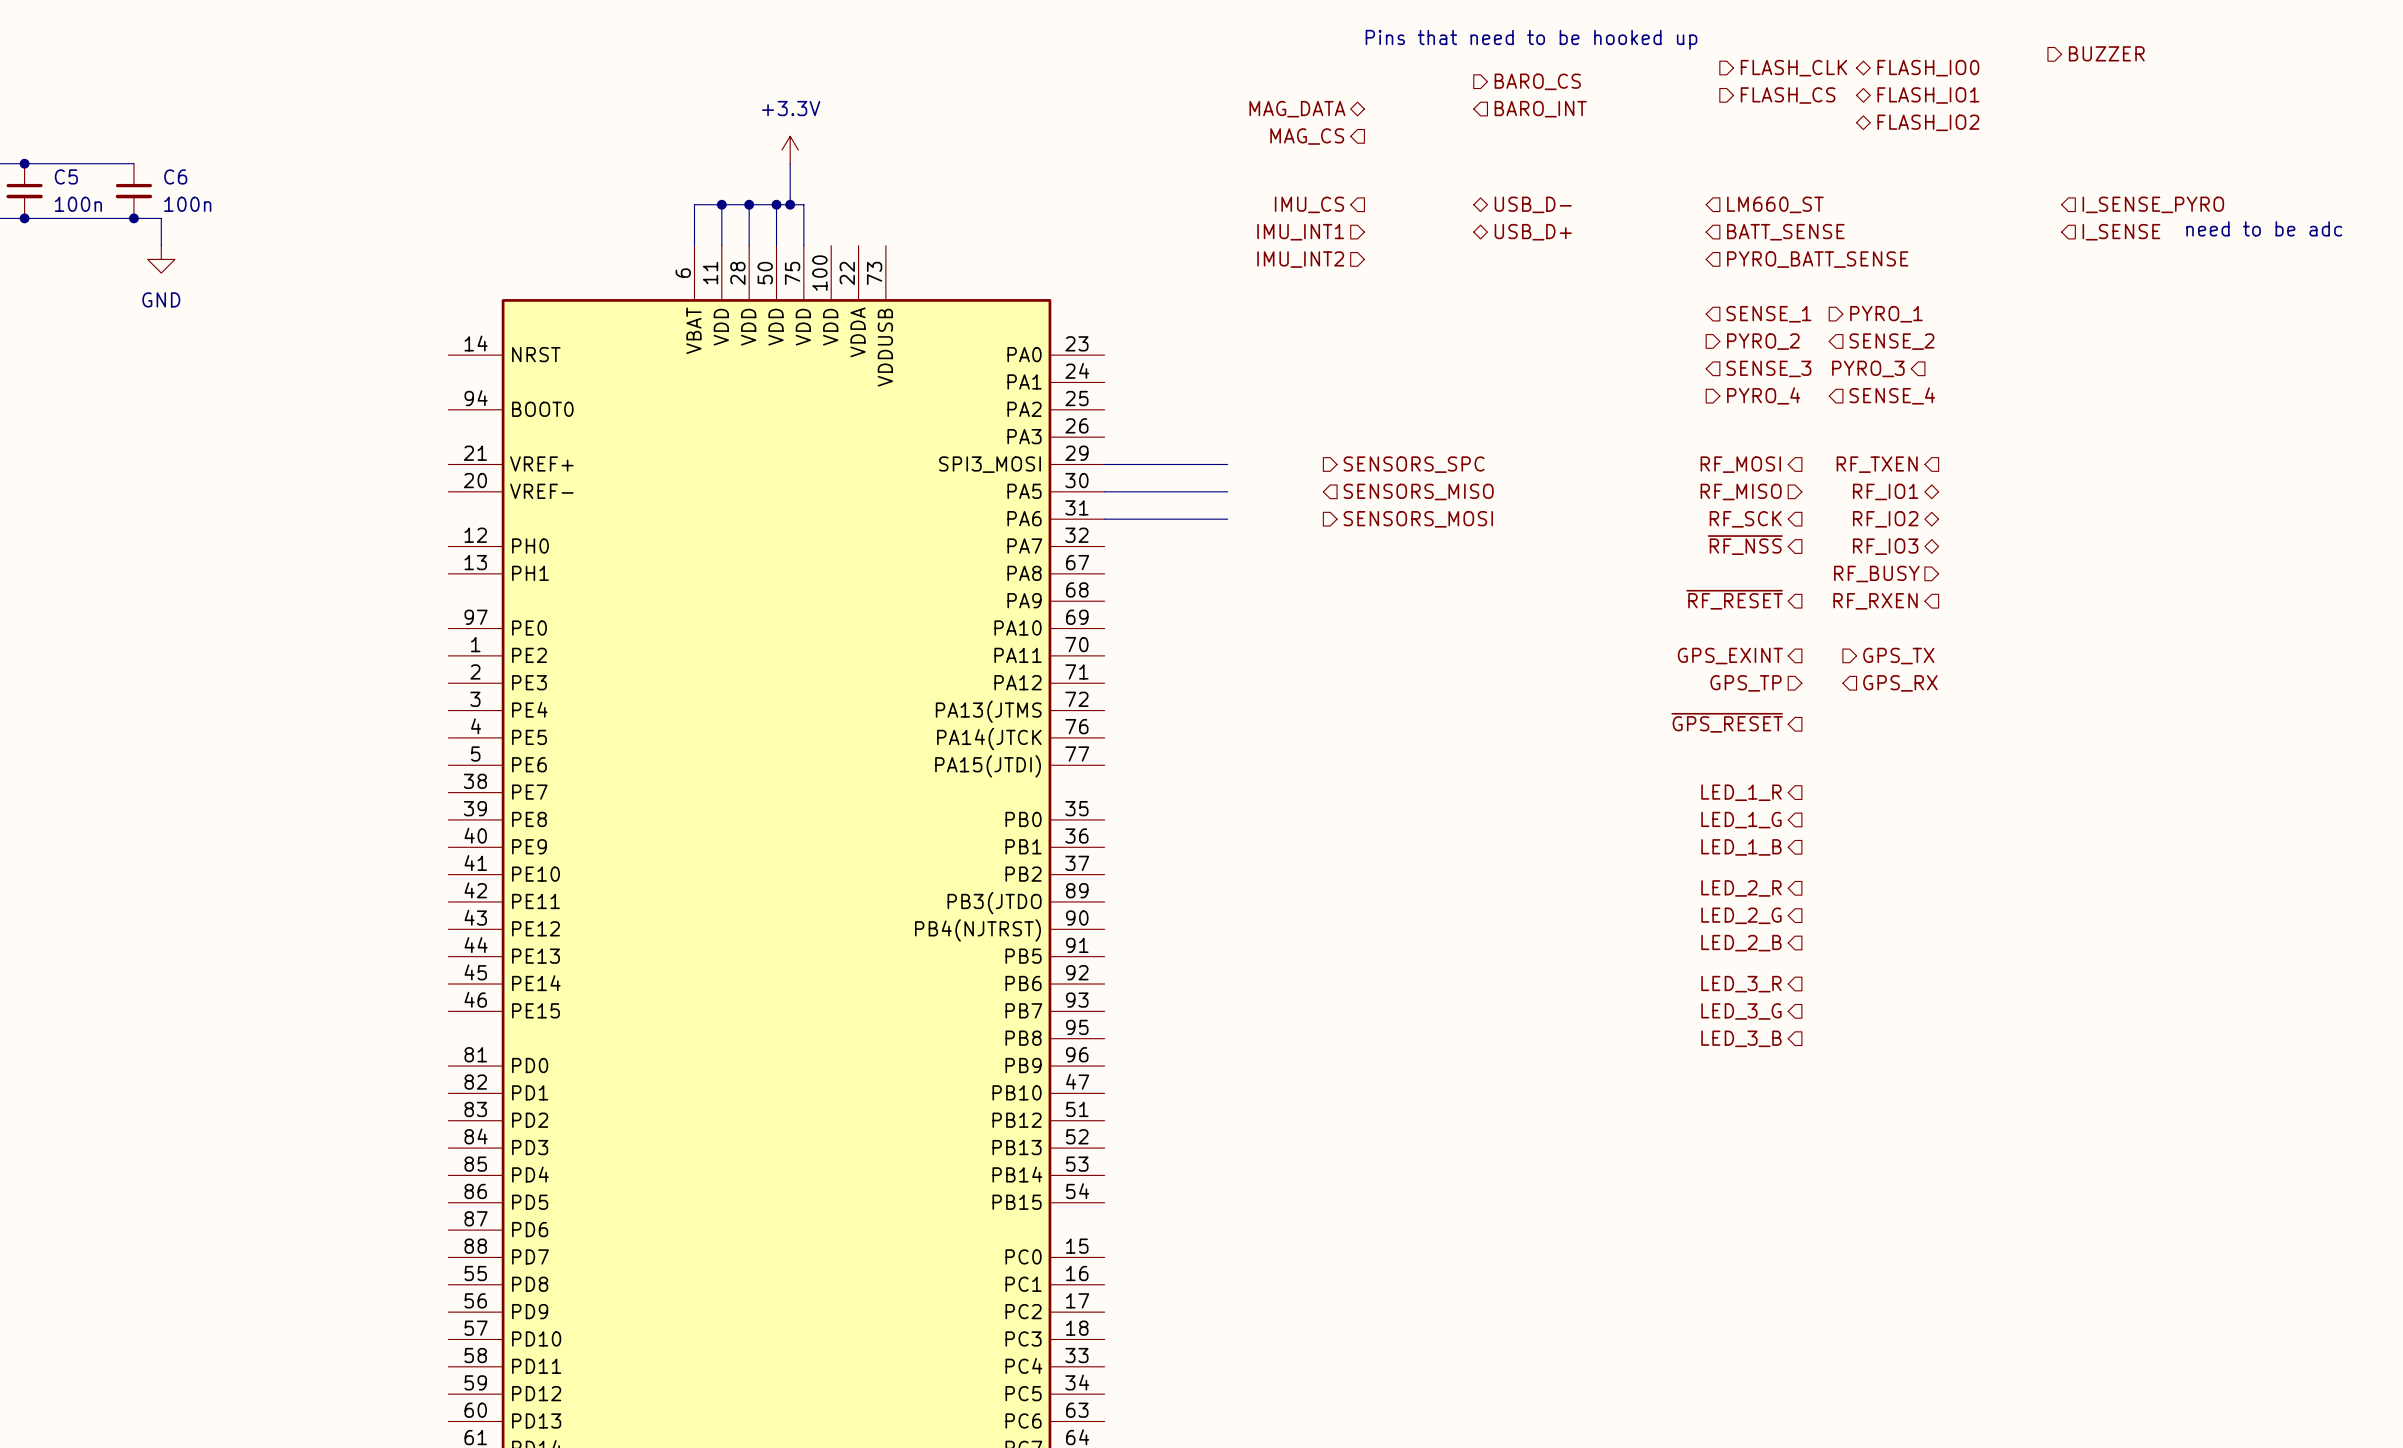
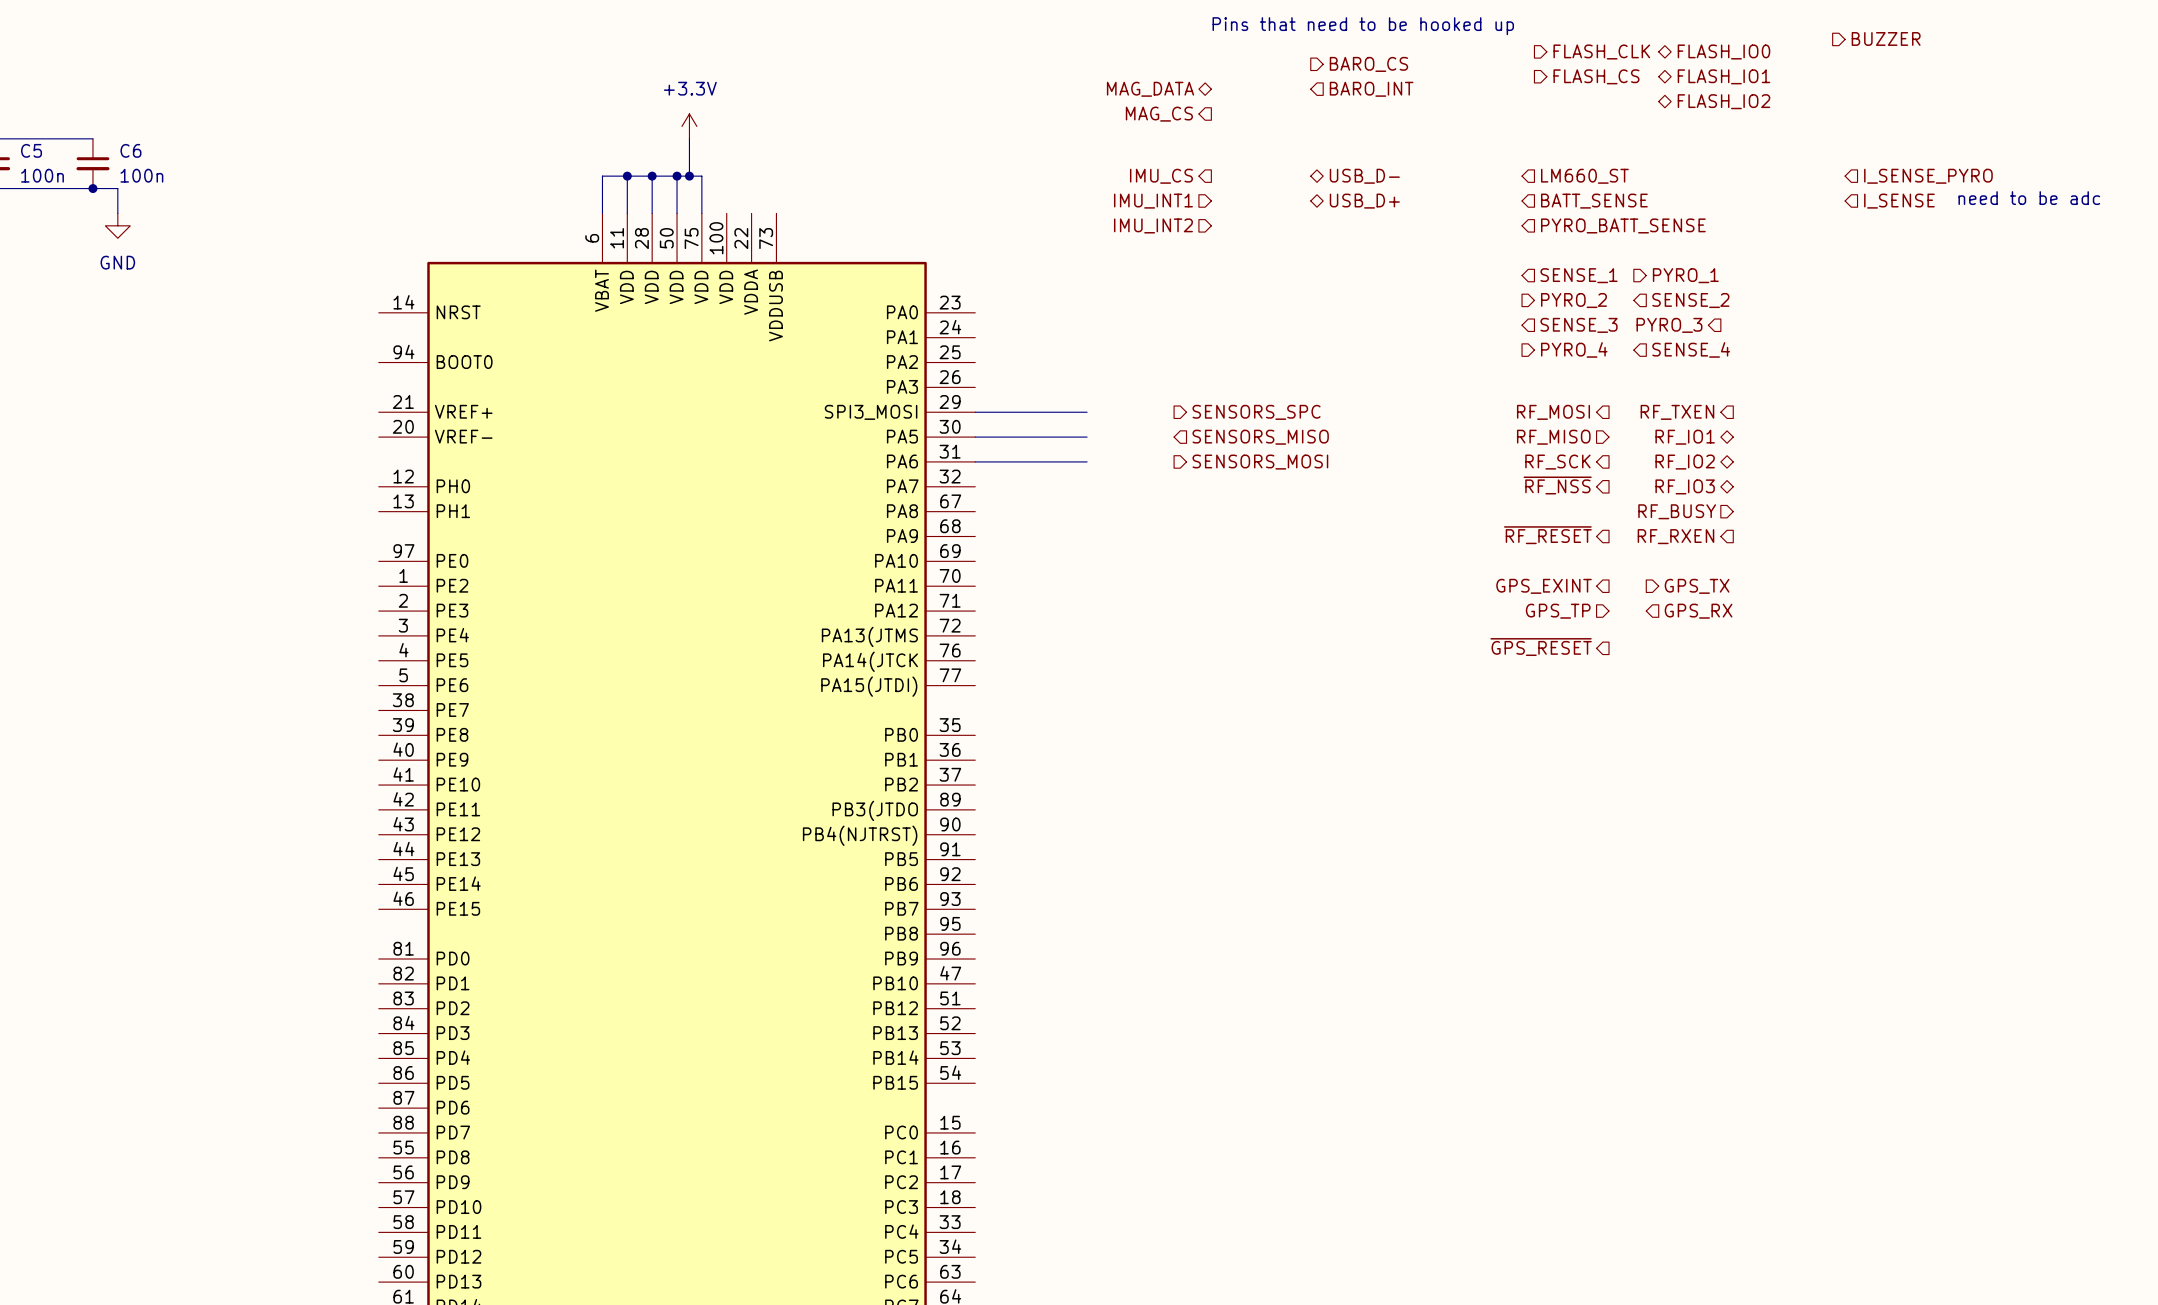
hierarchical label: LED_1_R (1741, 792) -> none
hierarchical label: LED_1_G (1741, 820) -> none
hierarchical label: LED_1_B (1741, 847) -> none
hierarchical label: LED_2_R (1741, 888) -> none
hierarchical label: LED_2_G (1741, 915) -> none
hierarchical label: LED_2_B (1741, 943) -> none
hierarchical label: LED_3_R (1741, 984) -> none
hierarchical label: LED_3_G (1741, 1011) -> none
hierarchical label: LED_3_B (1741, 1038) -> none

